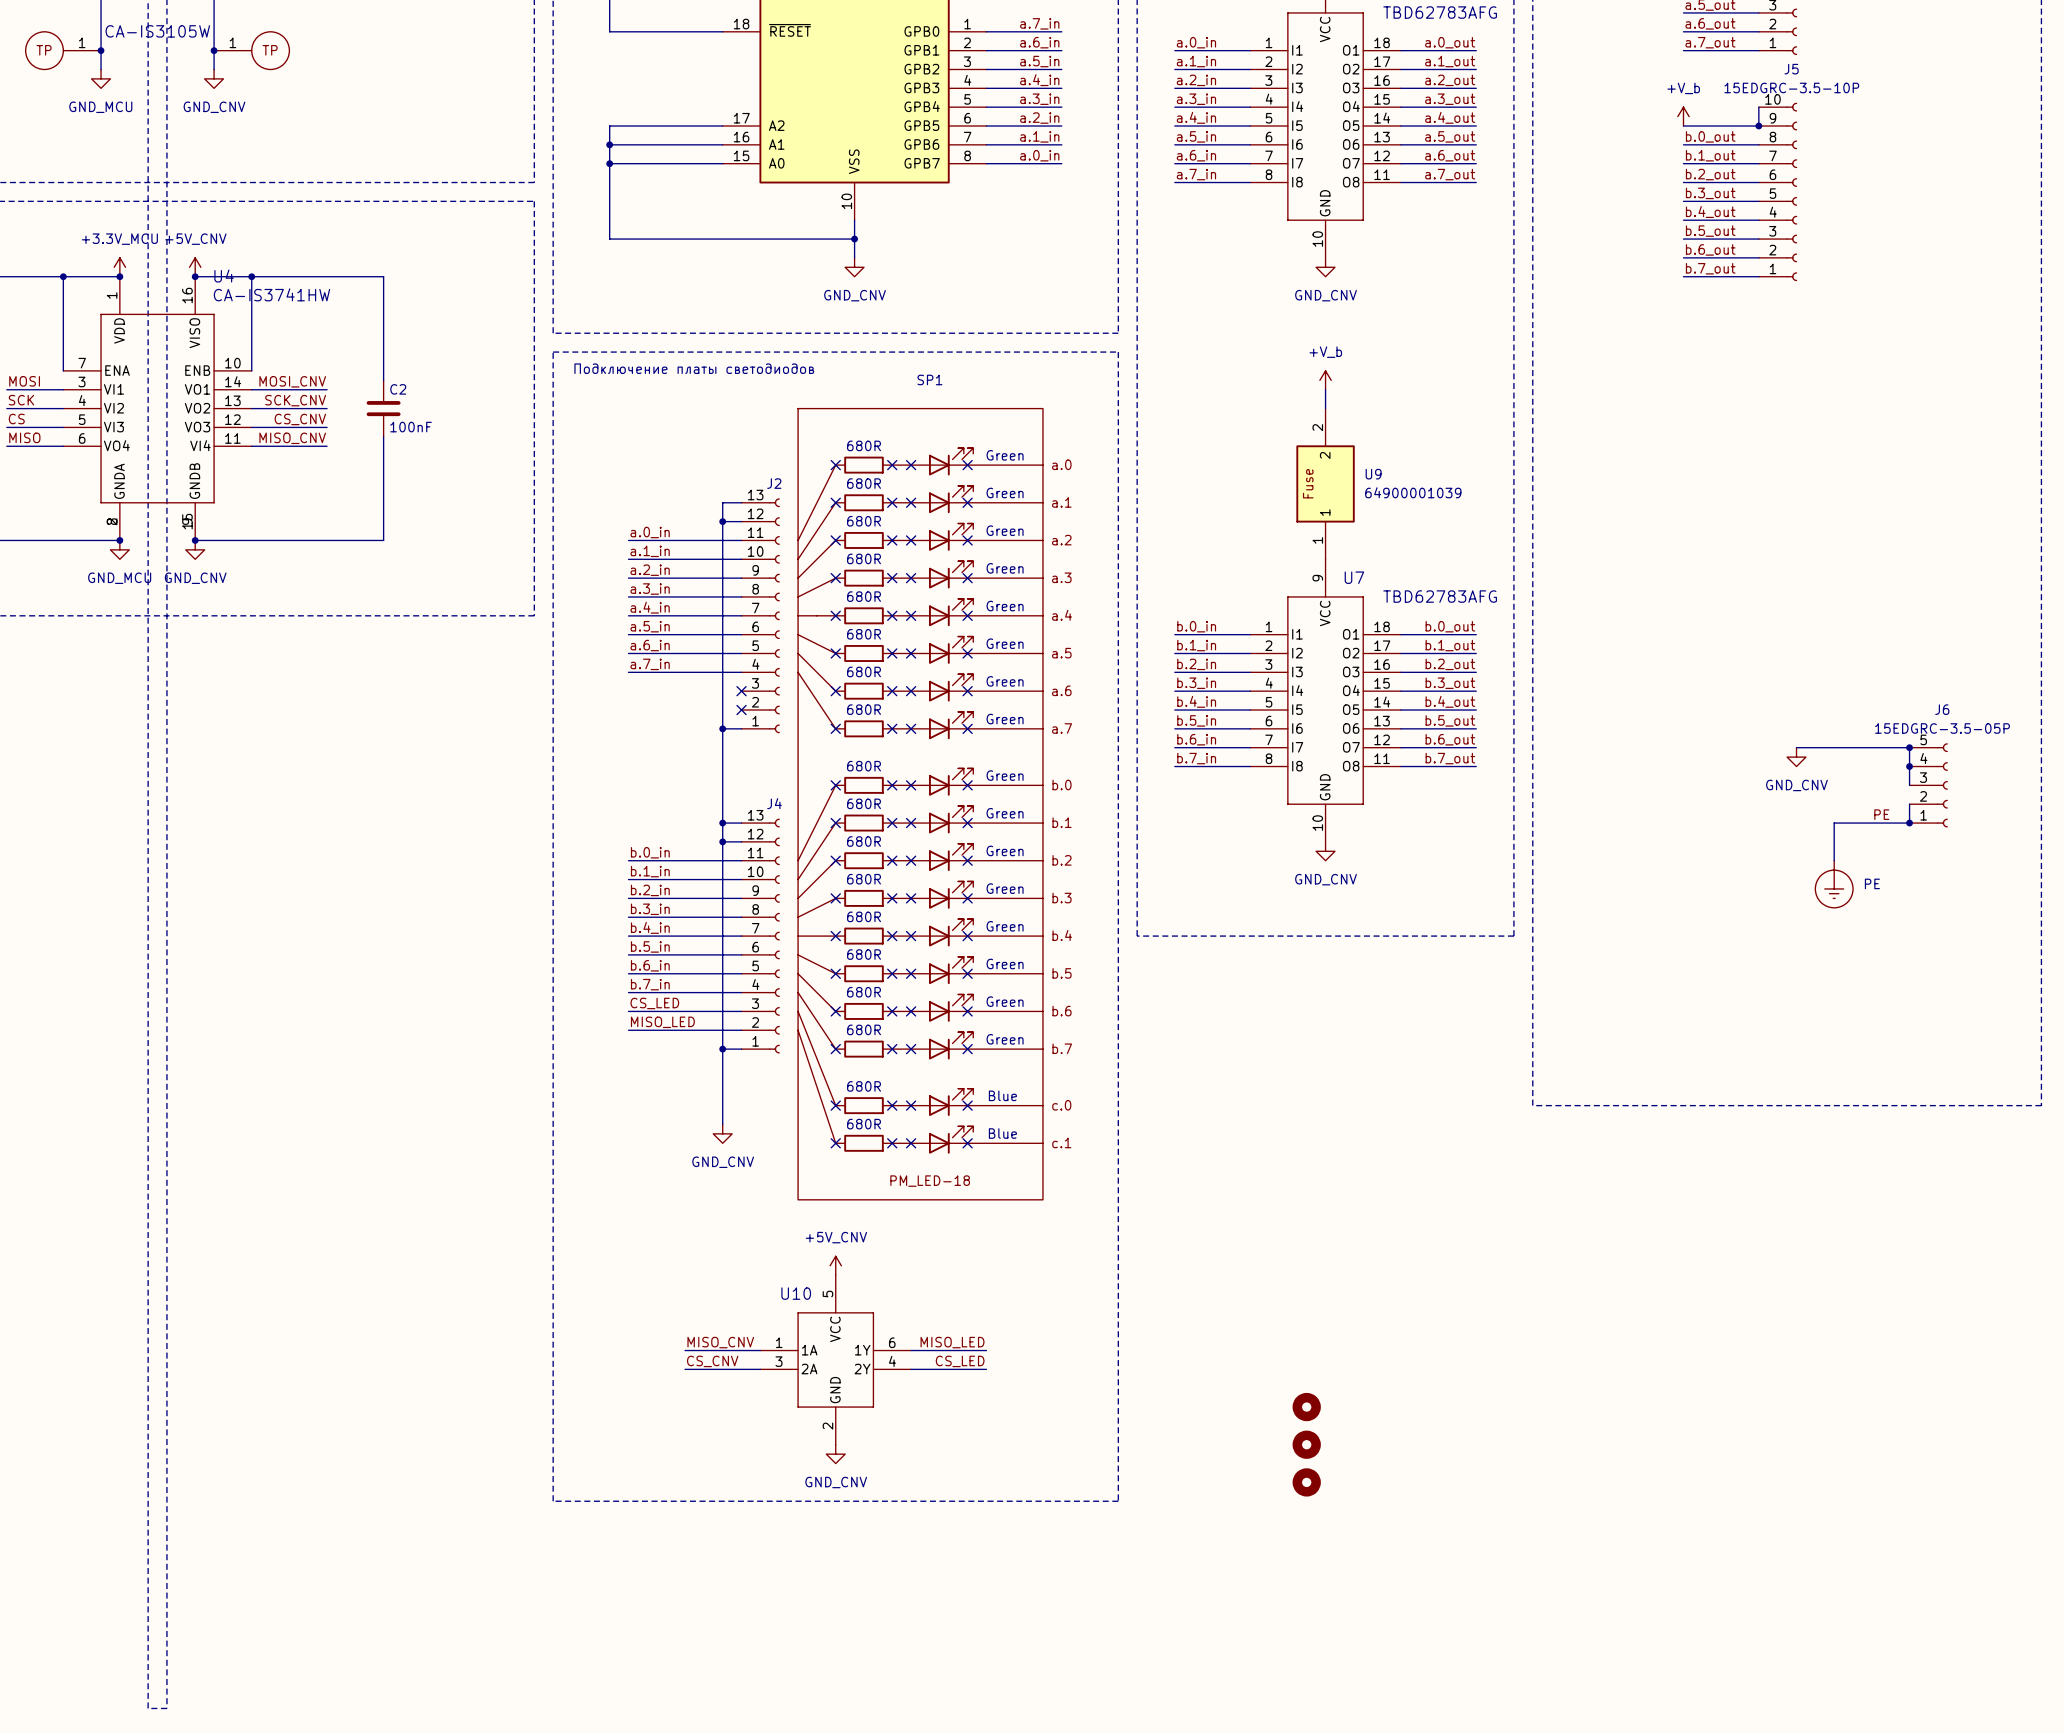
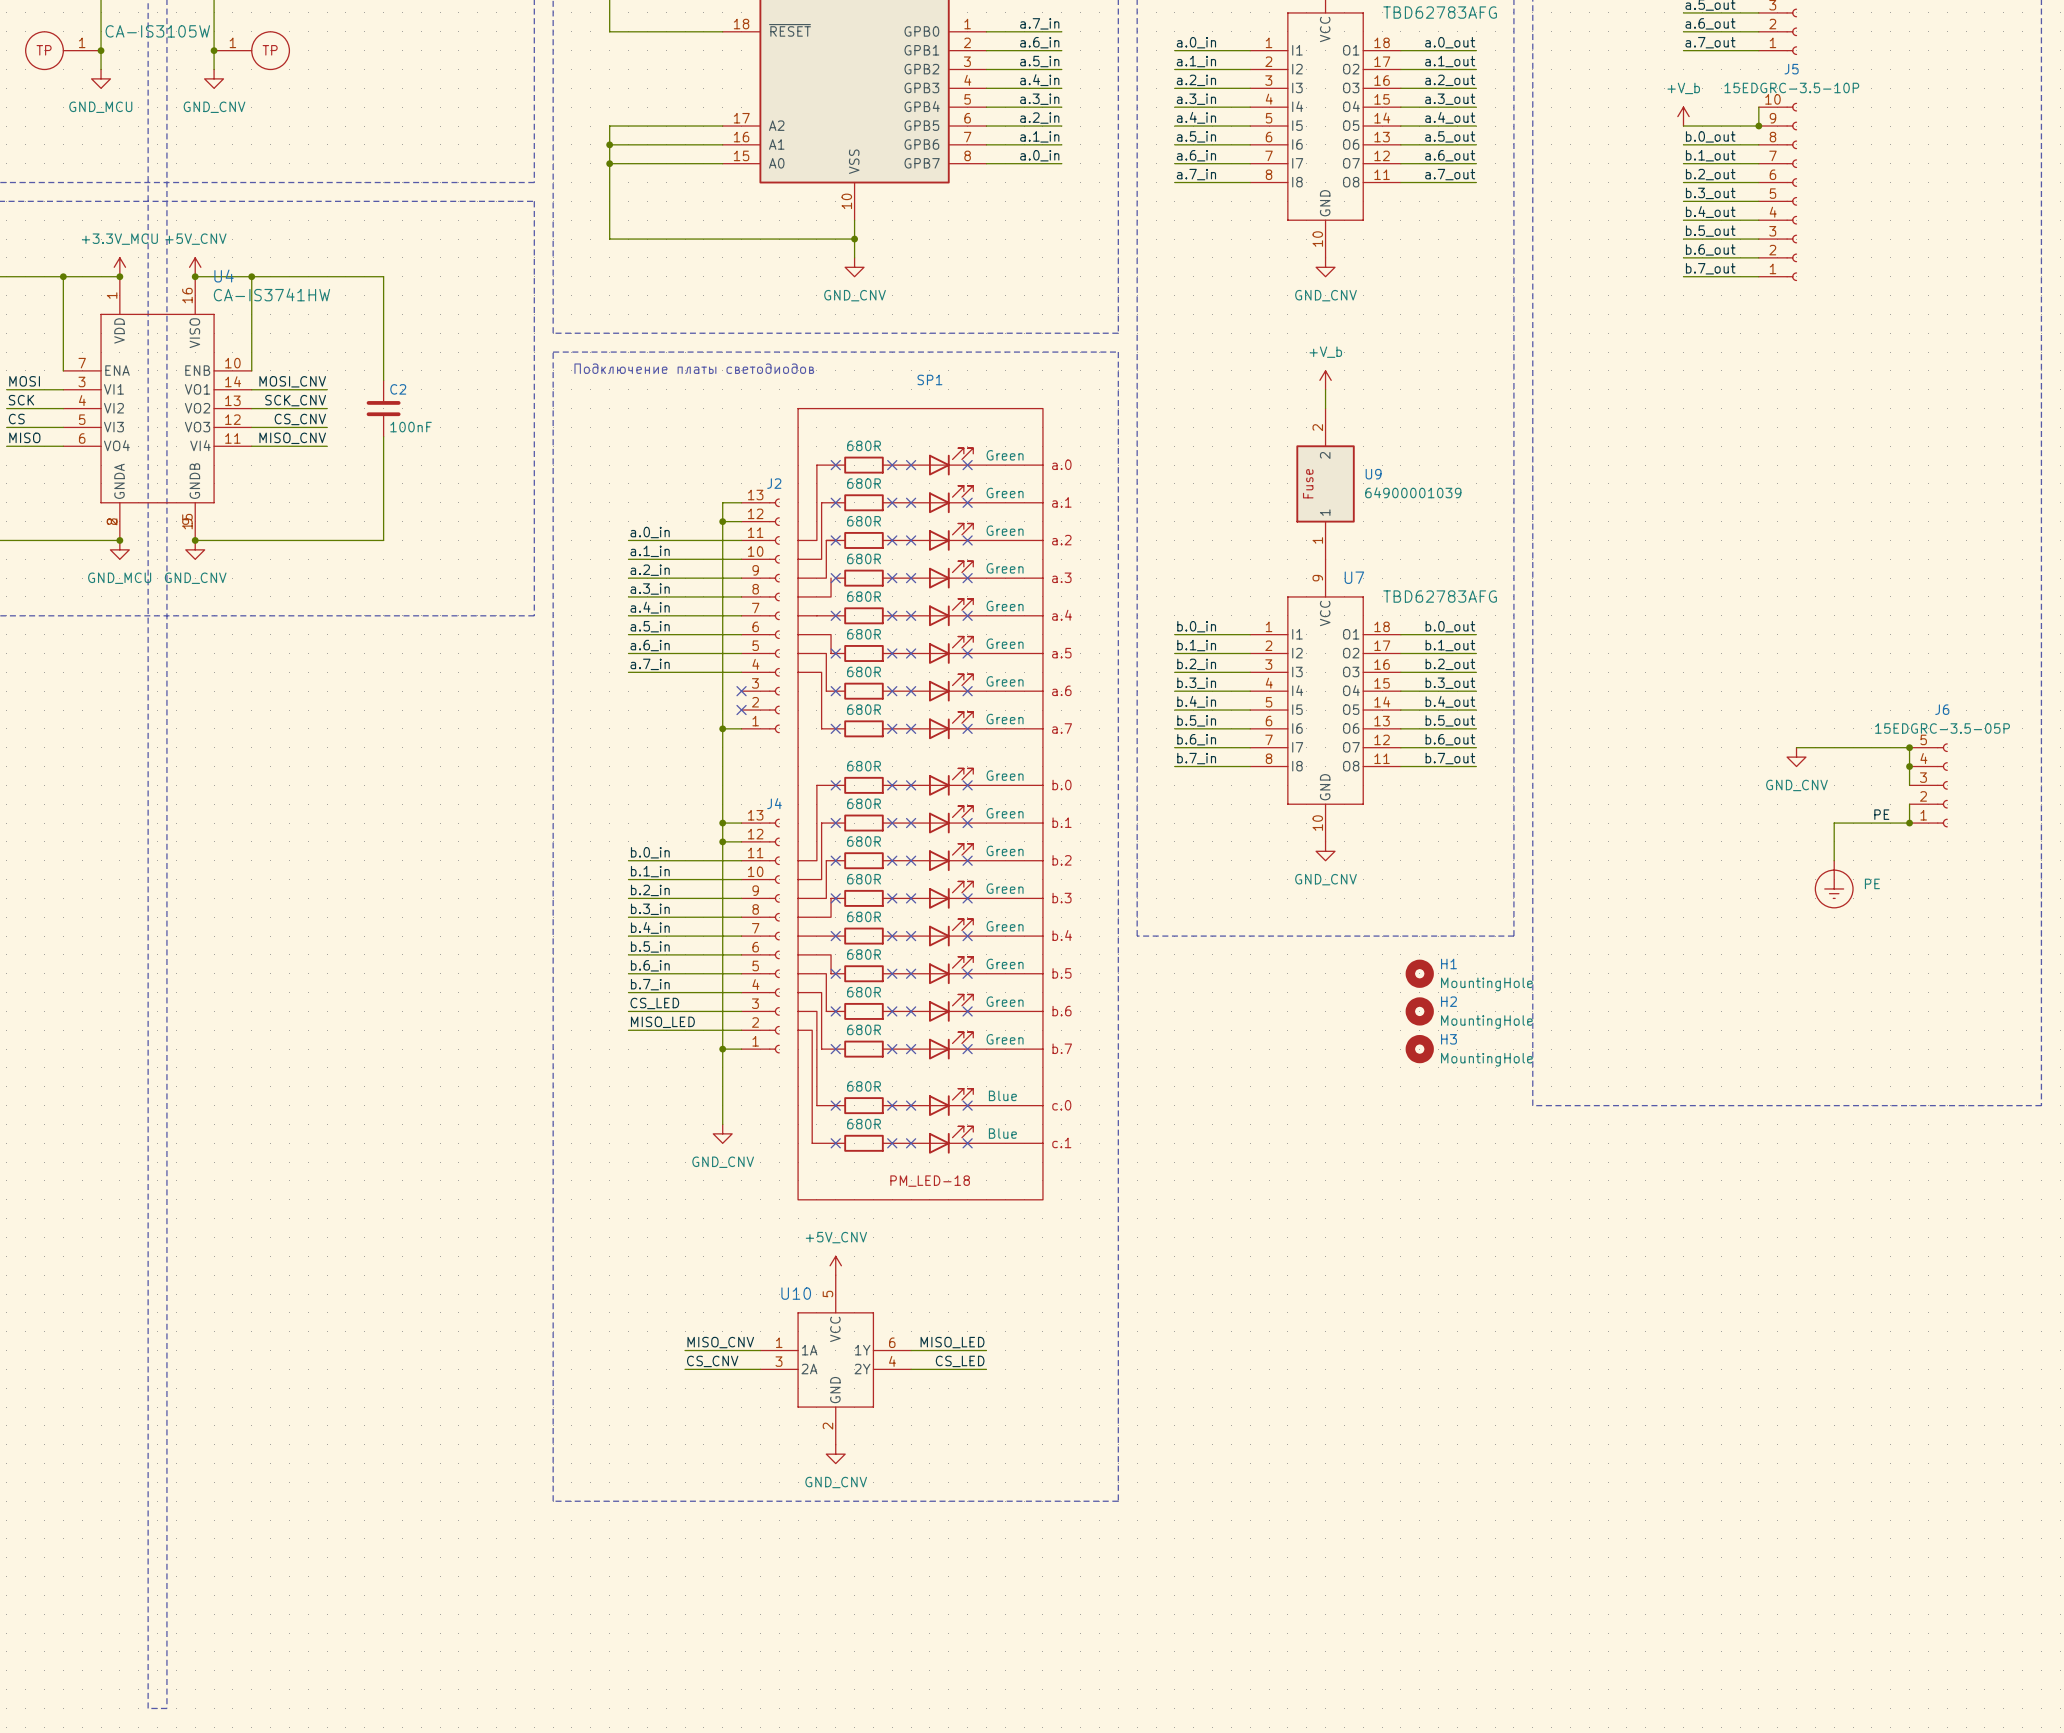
SP1 symbol: [798, 408, 1043, 1200] -> [798, 408, 1043, 1200]
H1: none -> MountingHole (1419, 973)
H2: none -> MountingHole (1419, 1011)
H3: none -> MountingHole (1419, 1049)
part: (1306, 1407) -> none
part: (1306, 1444) -> none
part: (1306, 1482) -> none

